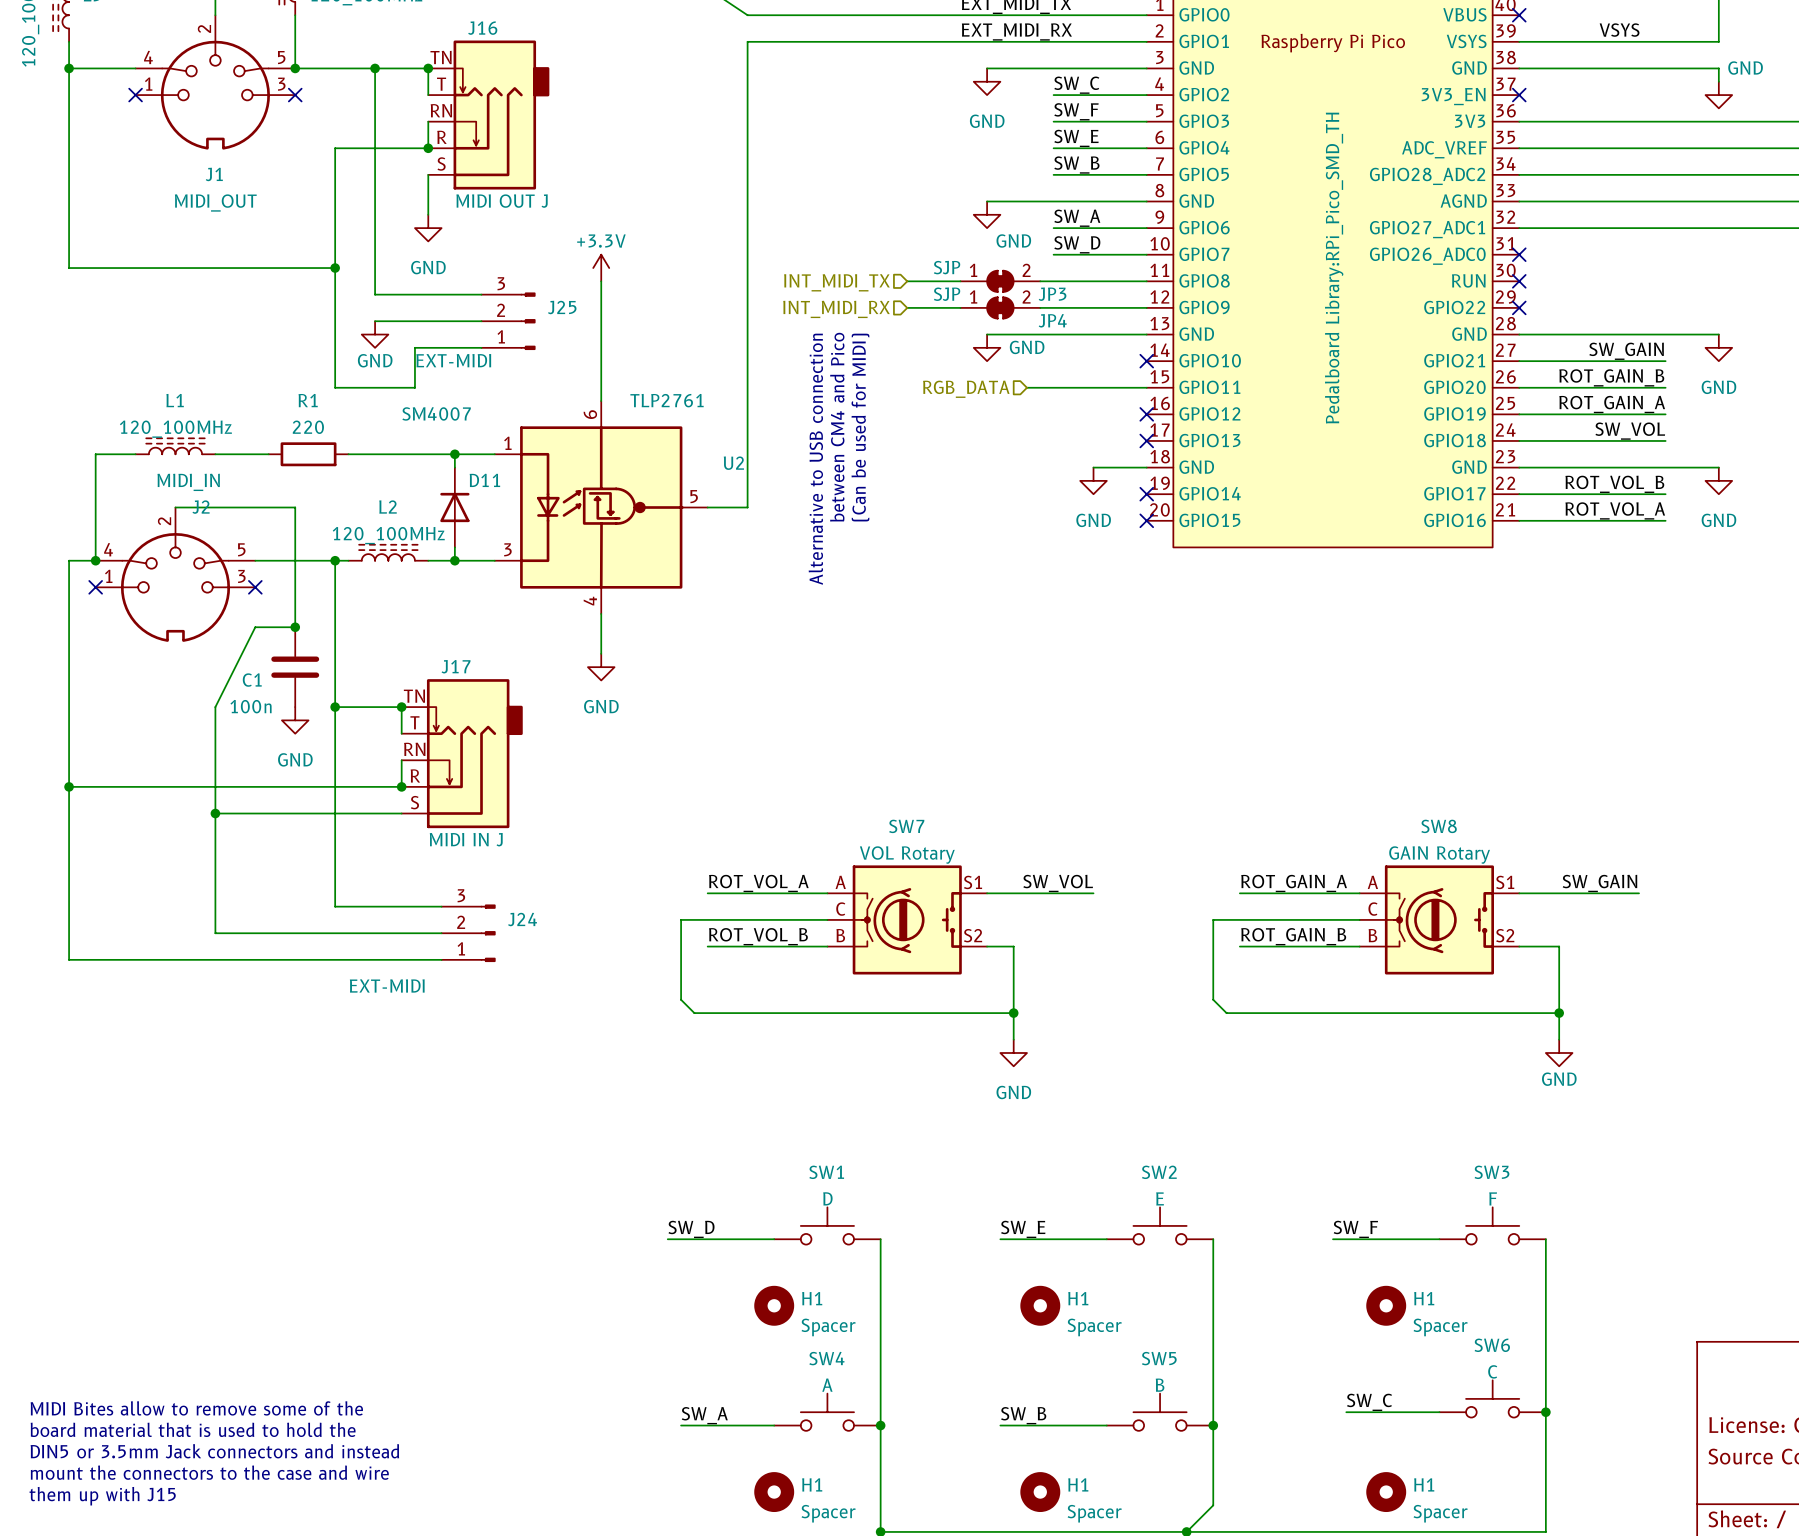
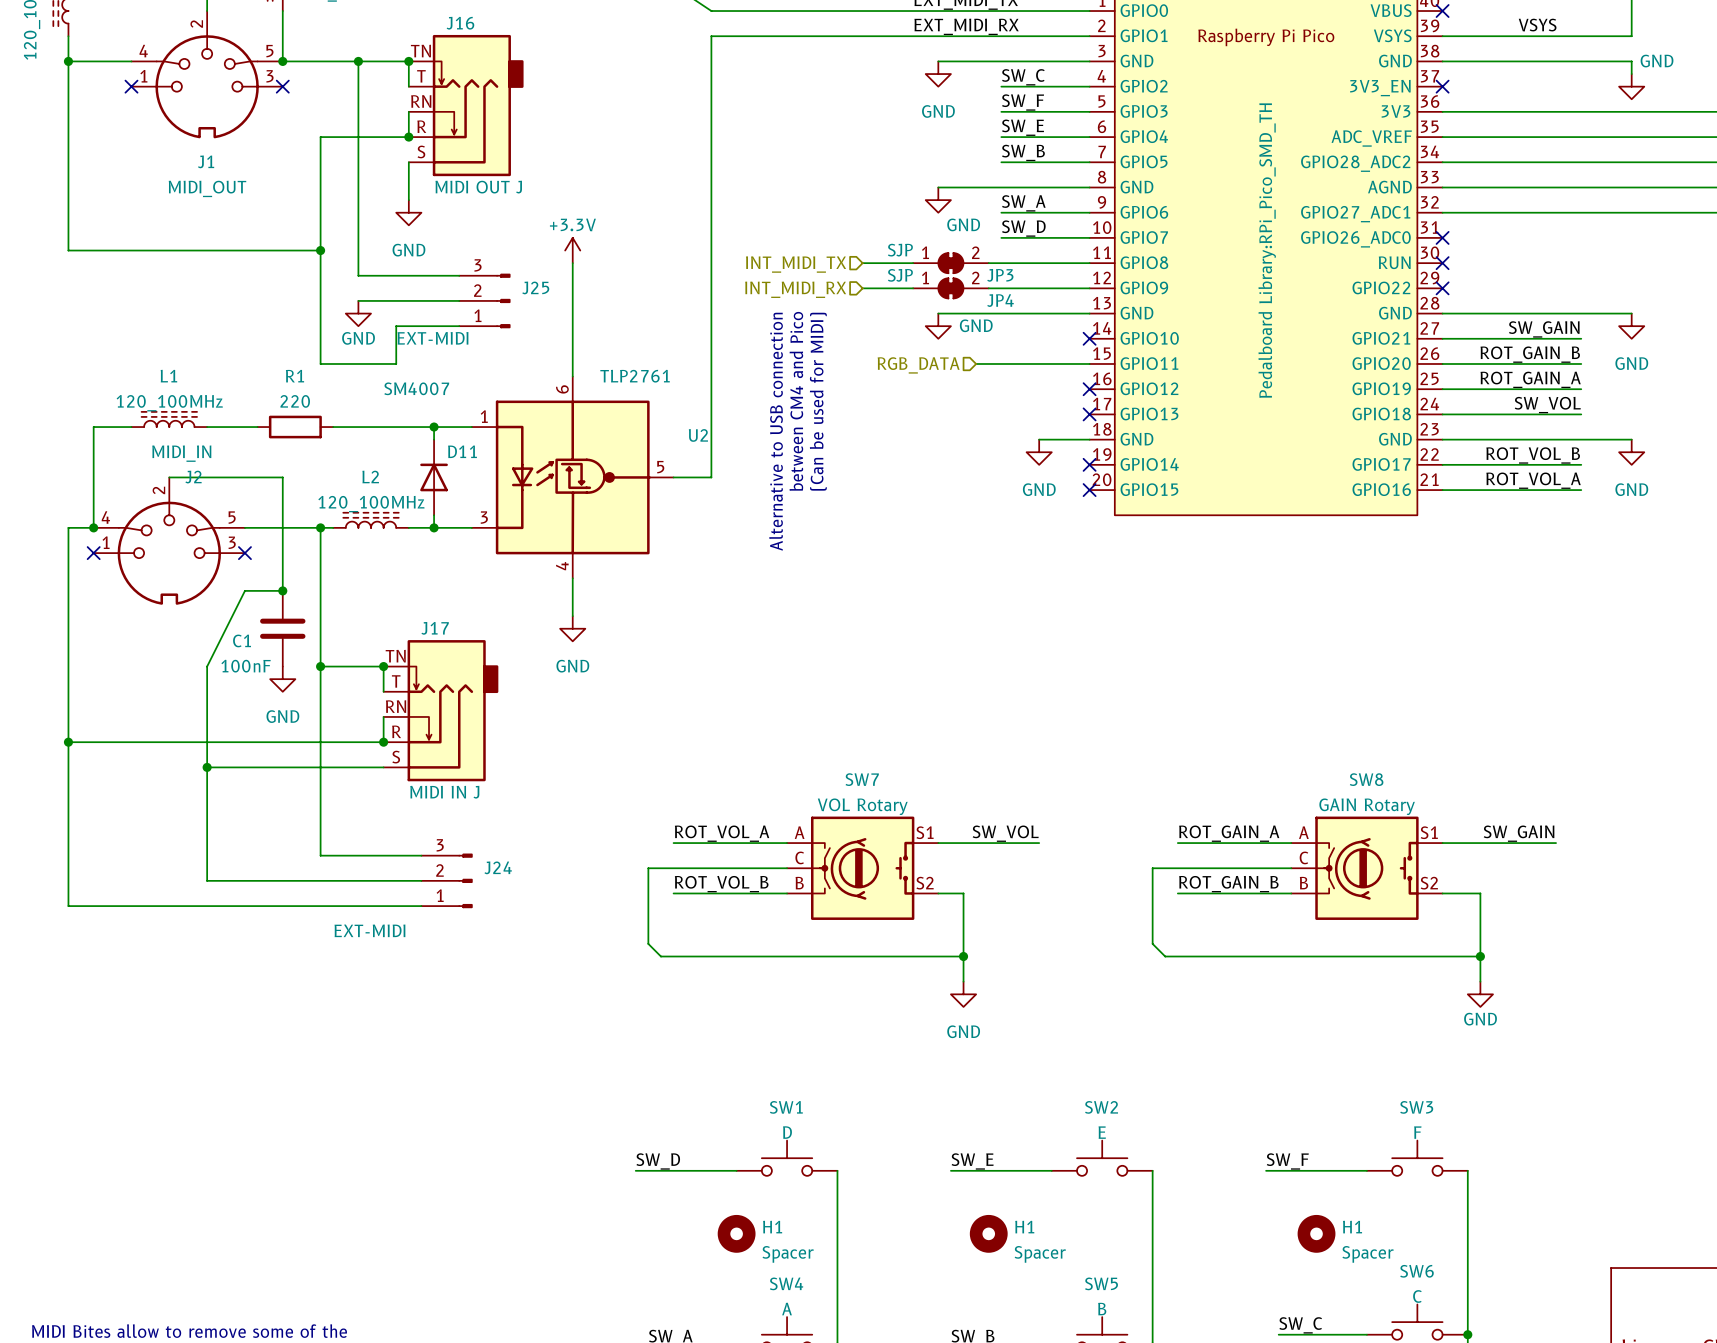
C1 value: 100n (251, 706) -> 100nF (246, 666)

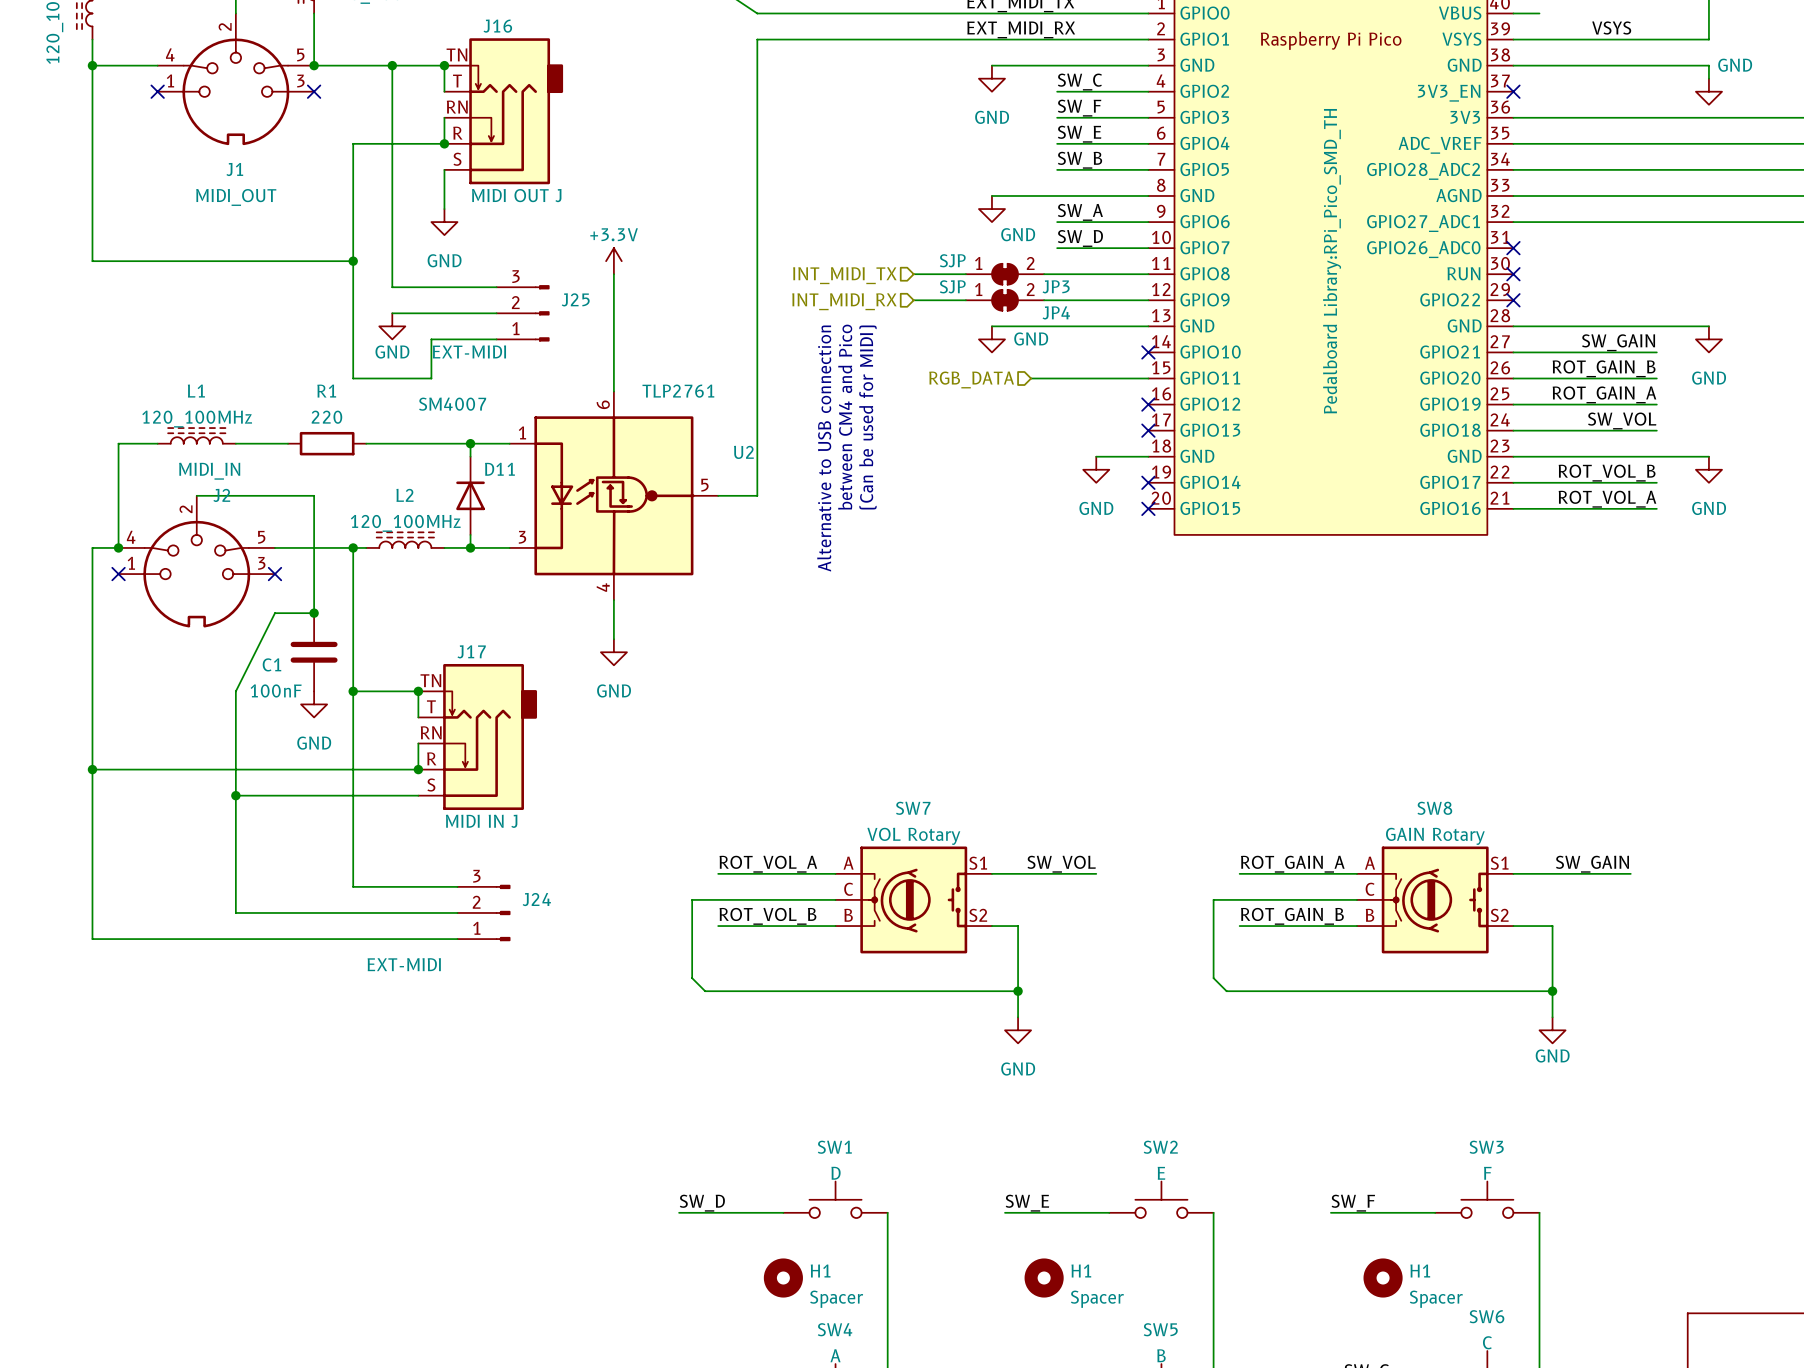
wire: none -> (1513, 13) (1539, 13)
no-connect mark: (1442, 11) -> none

